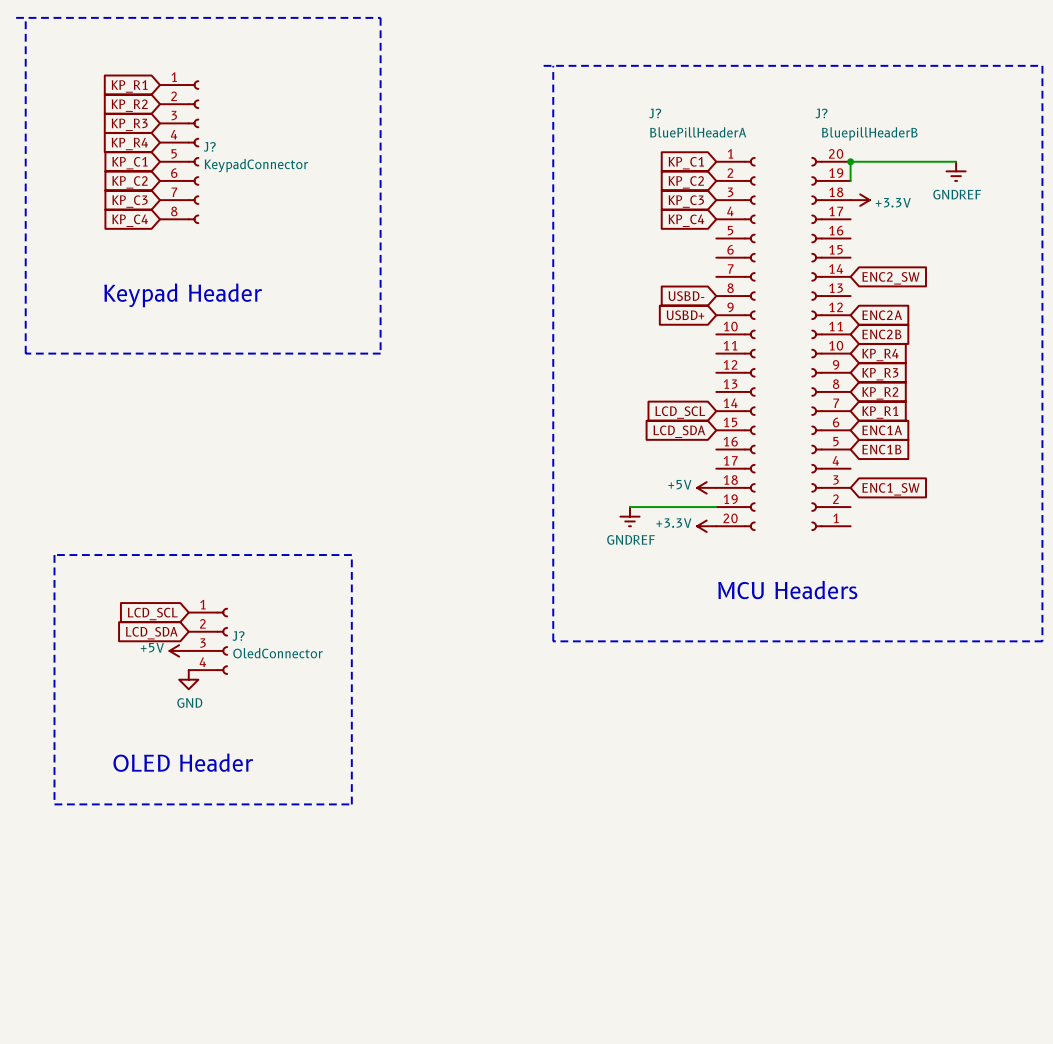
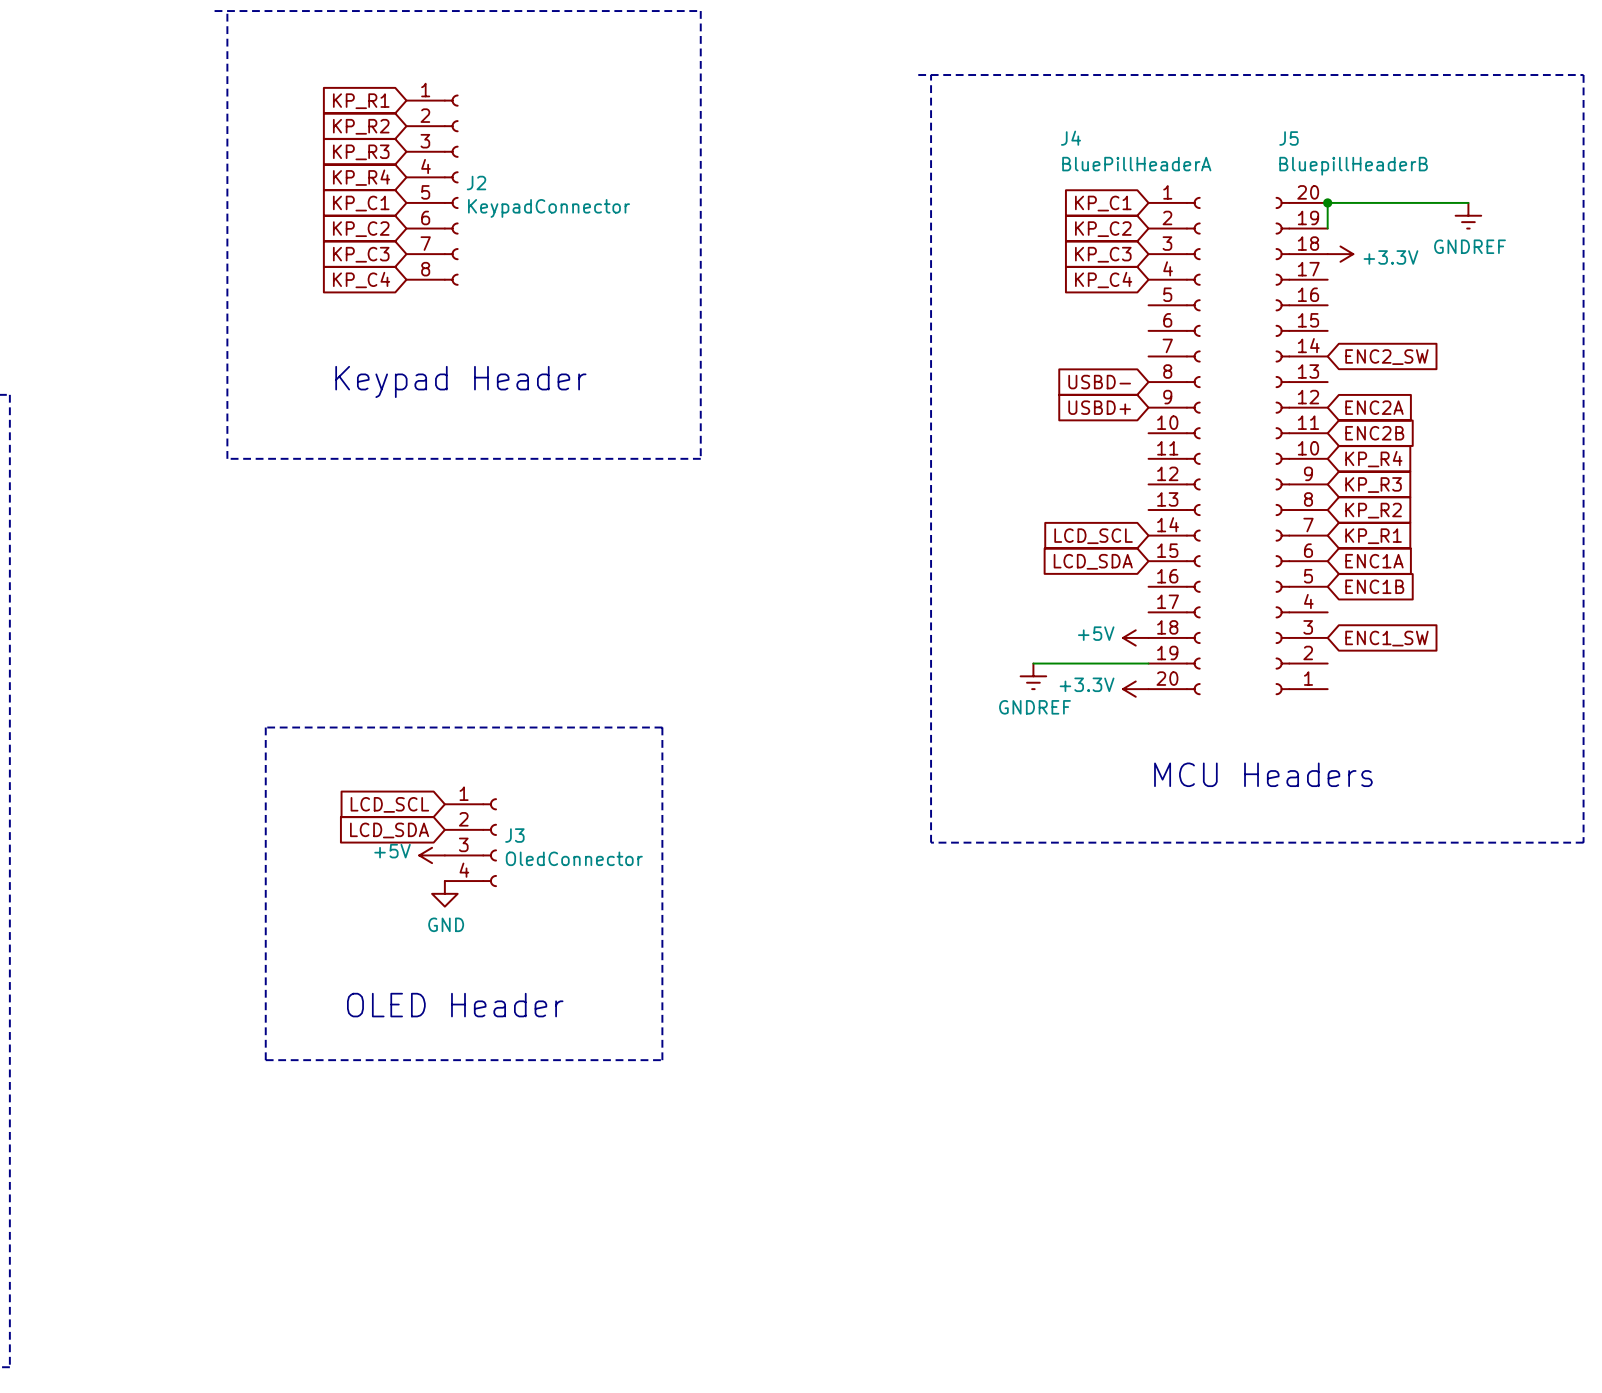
J? name: J? (655, 113) -> J4 (1070, 138)
J? name: J? (821, 113) -> J5 (1288, 138)
J? name: J? (209, 146) -> J2 (476, 183)
J? name: J? (238, 636) -> J3 (514, 835)

